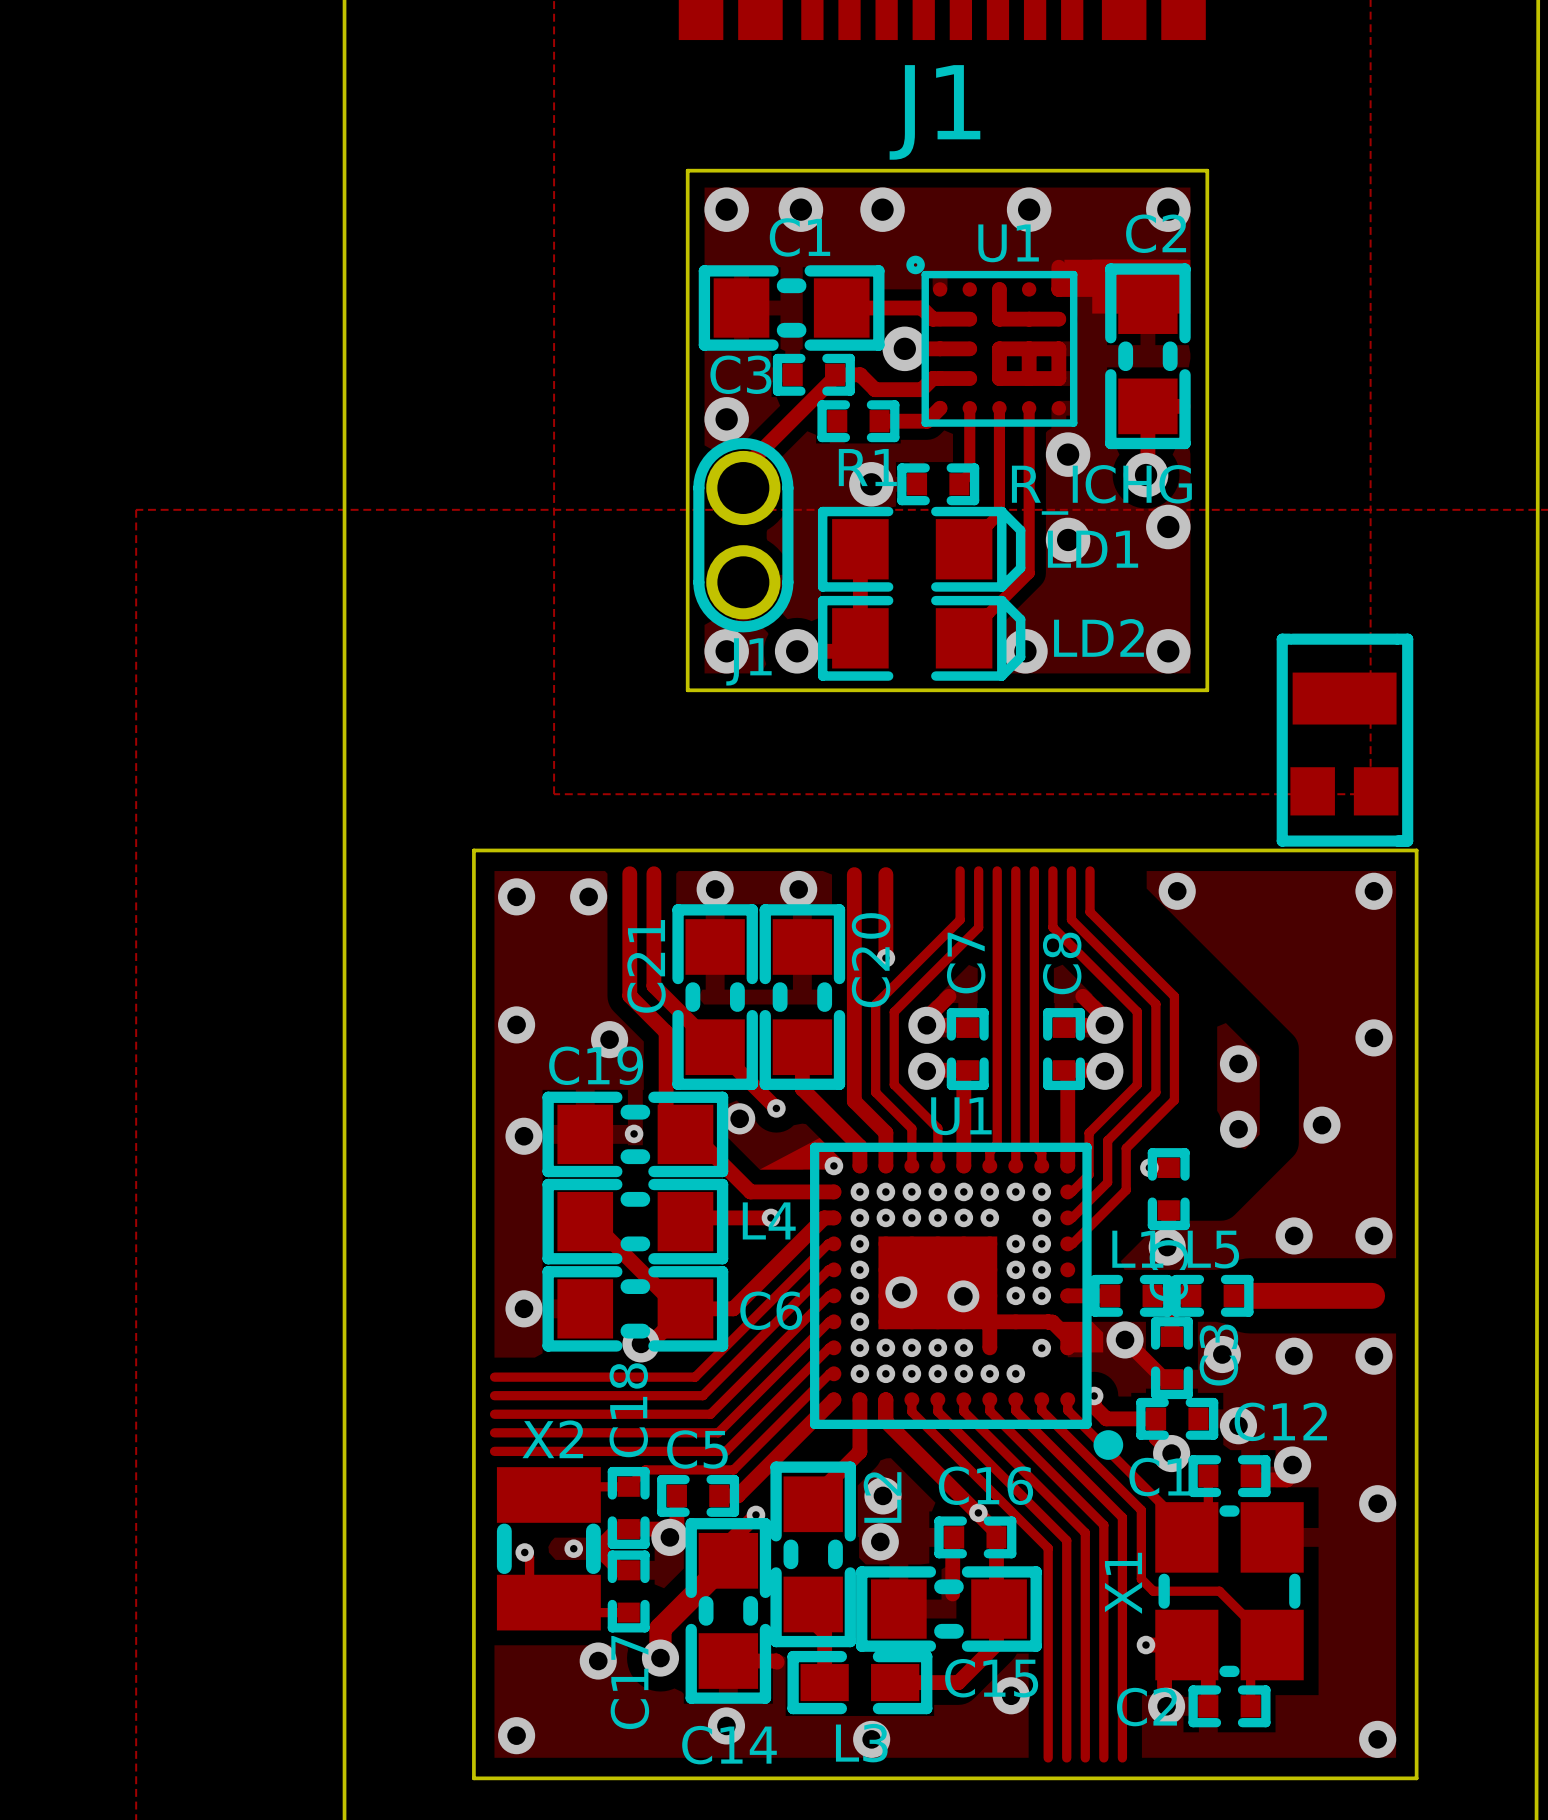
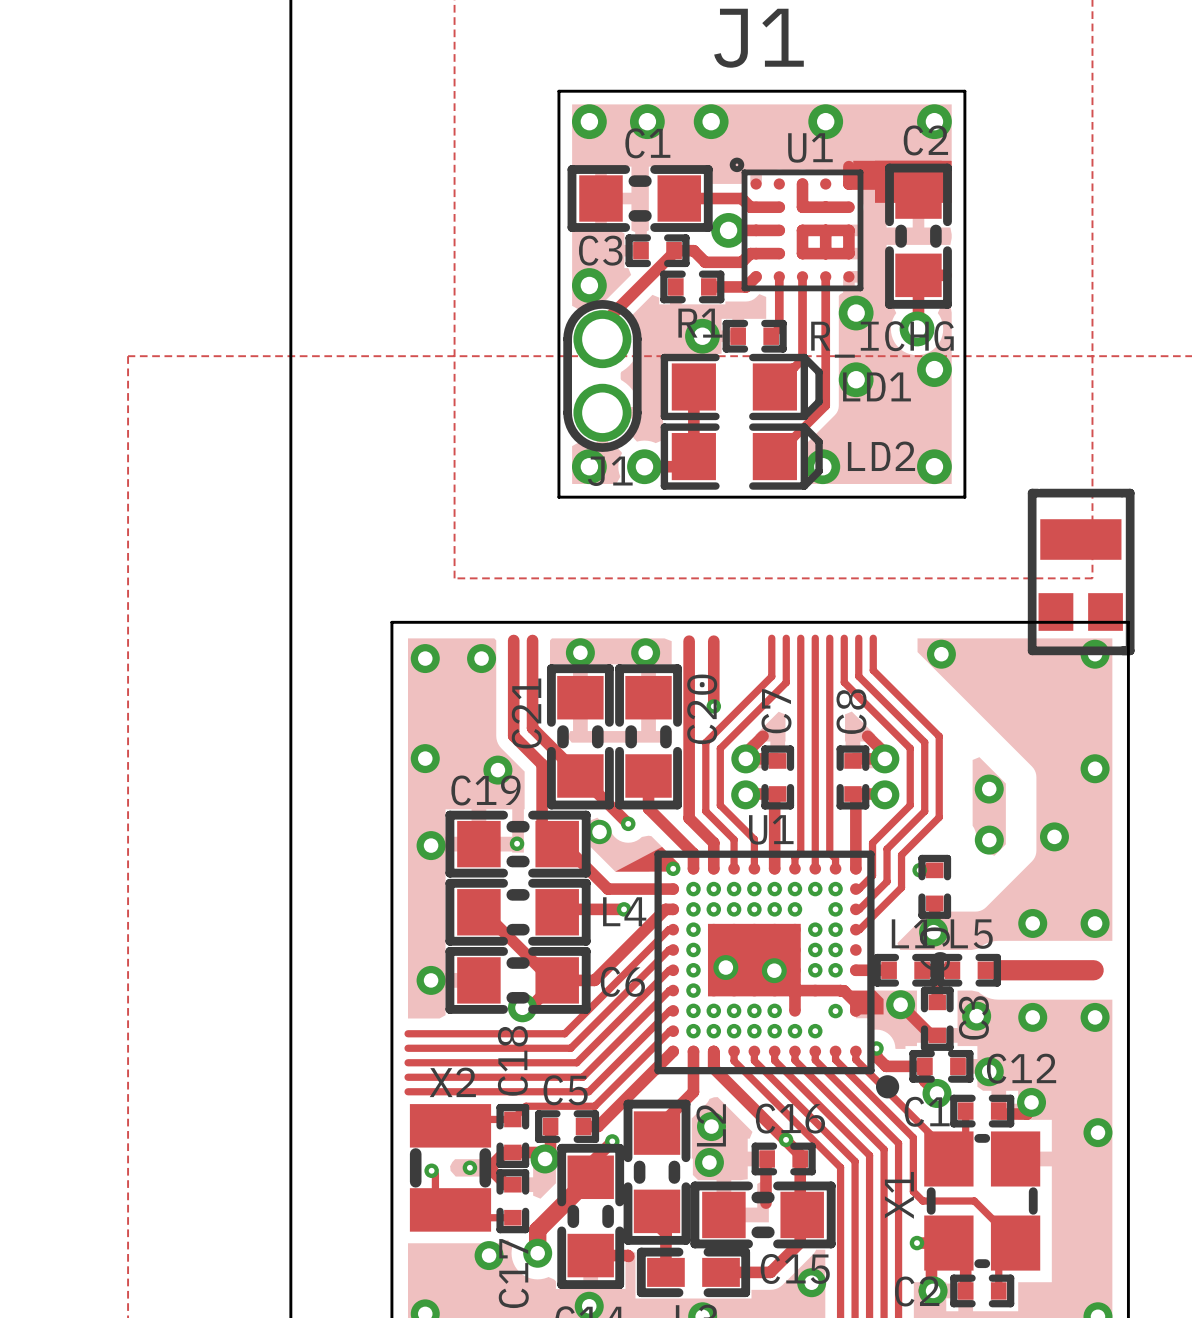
part position: (1344, 740) -> (1081, 571)

